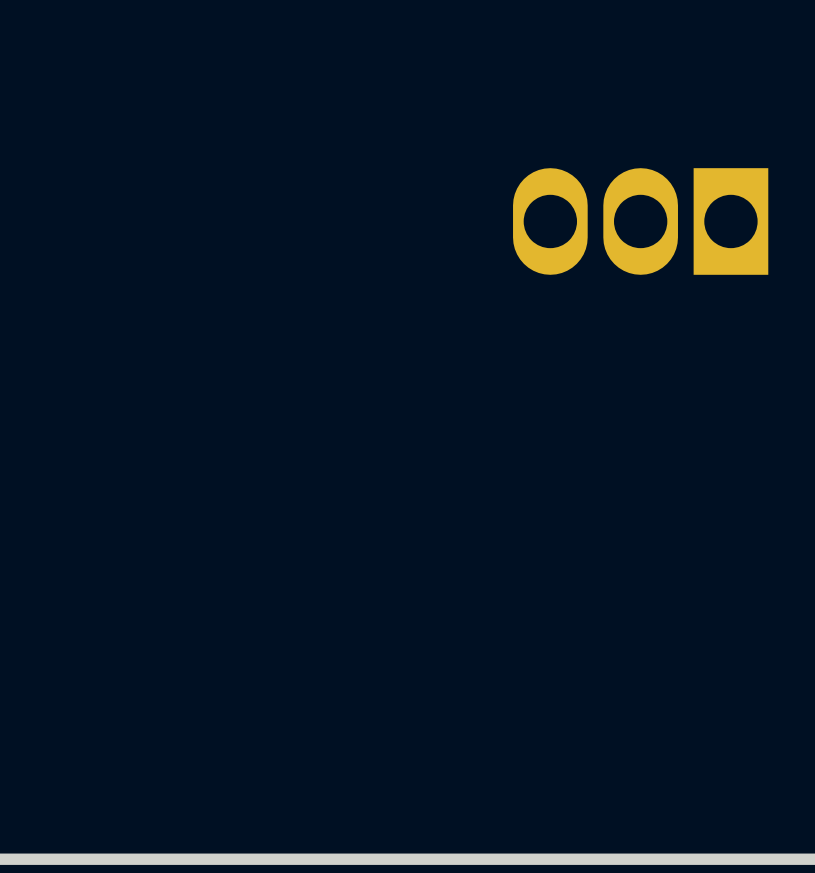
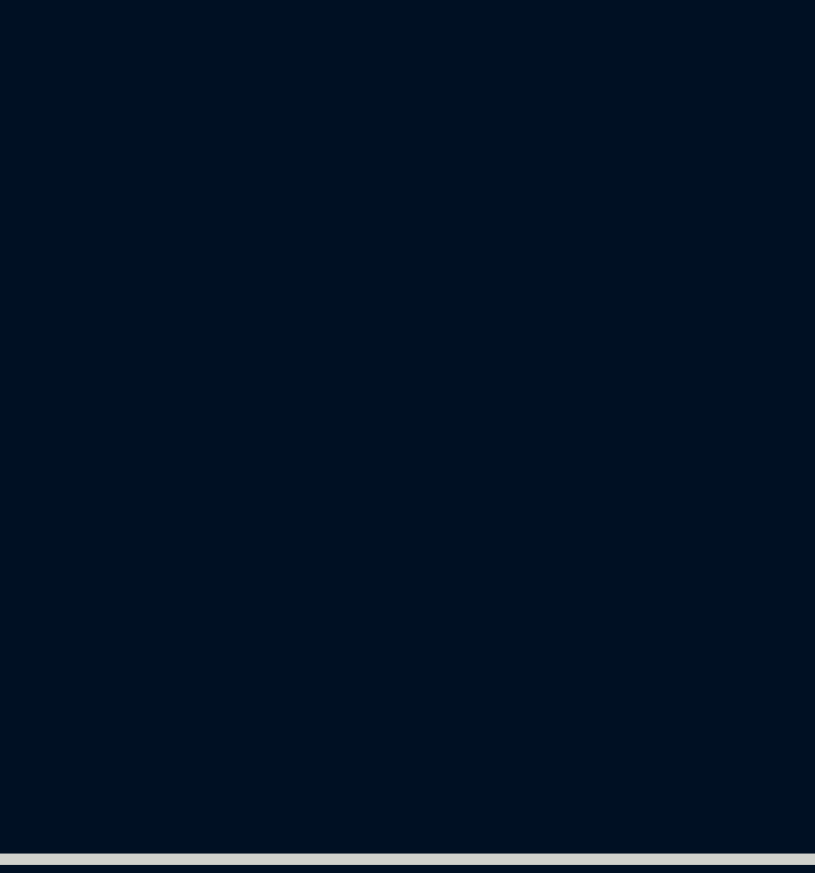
part: (640, 221) -> none

